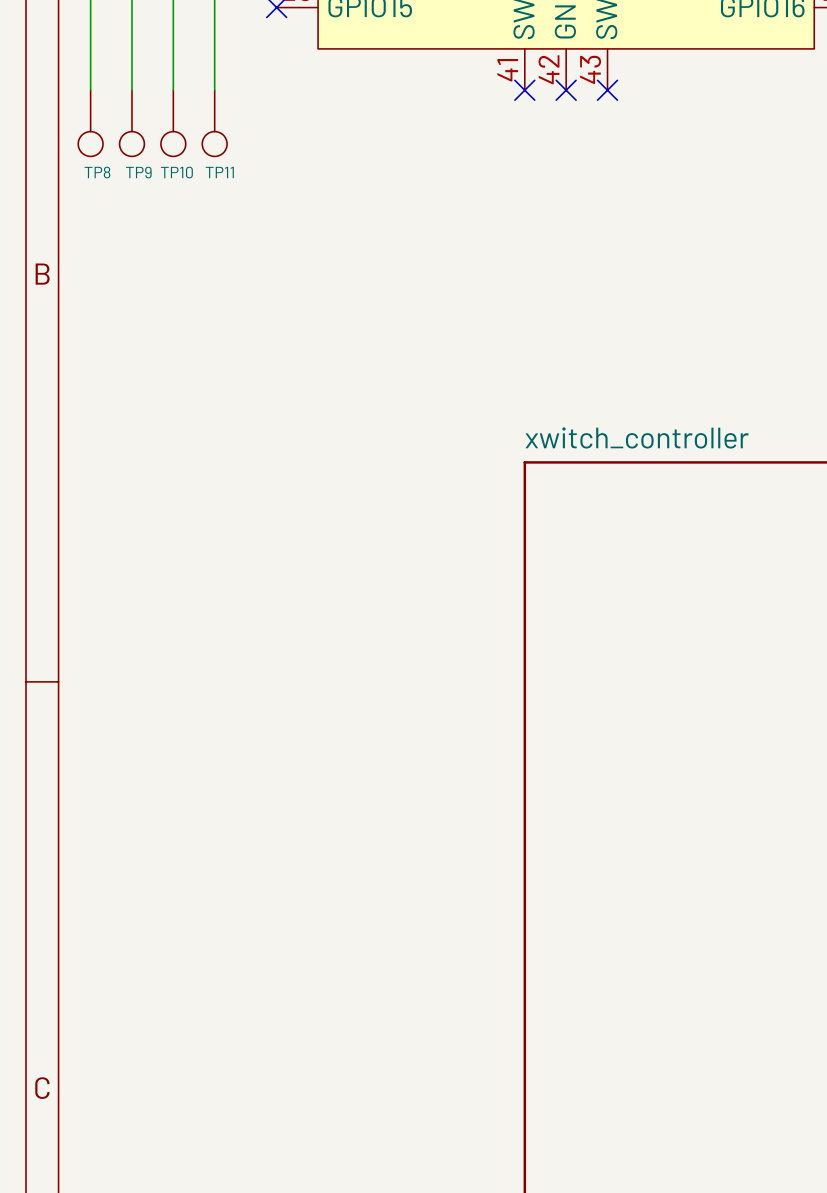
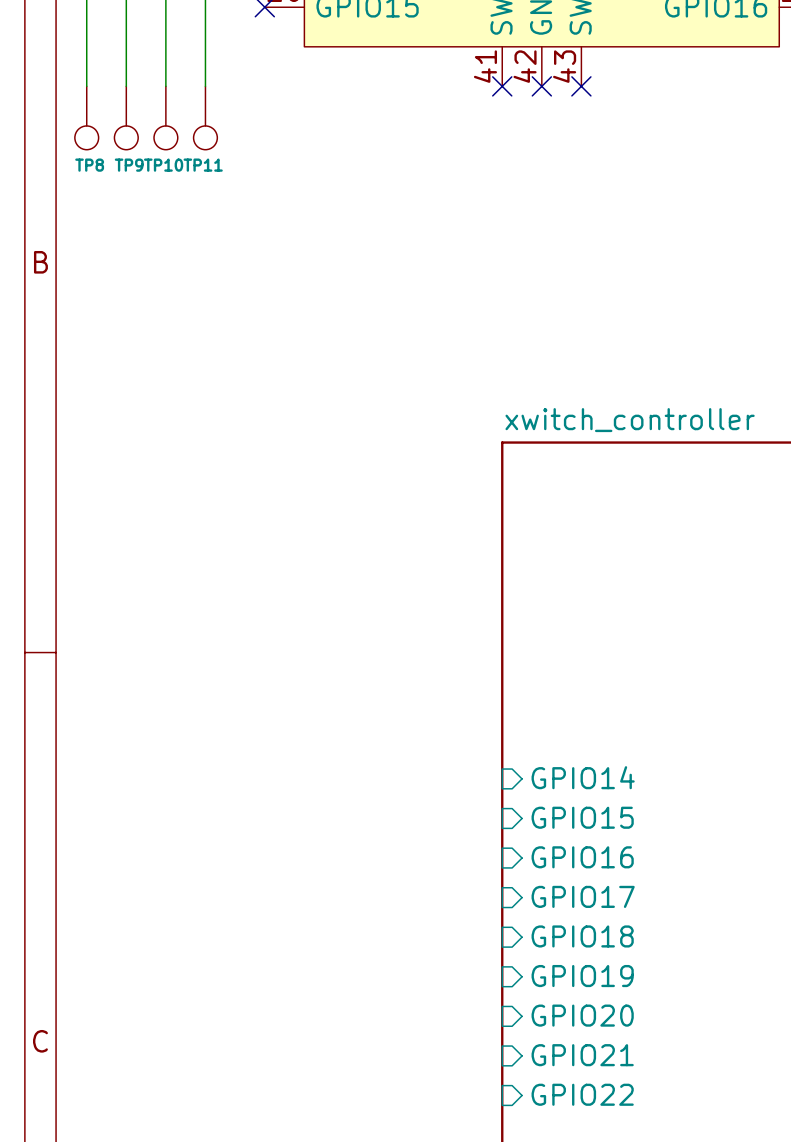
sheet pin: none -> GPIO14 (583, 777)
sheet pin: none -> GPIO15 (582, 817)
sheet pin: none -> GPIO16 (582, 857)
sheet pin: none -> GPIO17 (583, 896)
sheet pin: none -> GPIO18 (582, 936)
sheet pin: none -> GPIO19 (582, 976)
sheet pin: none -> GPIO20 (582, 1015)
sheet pin: none -> GPIO21 (582, 1055)
sheet pin: none -> GPIO22 (582, 1094)

